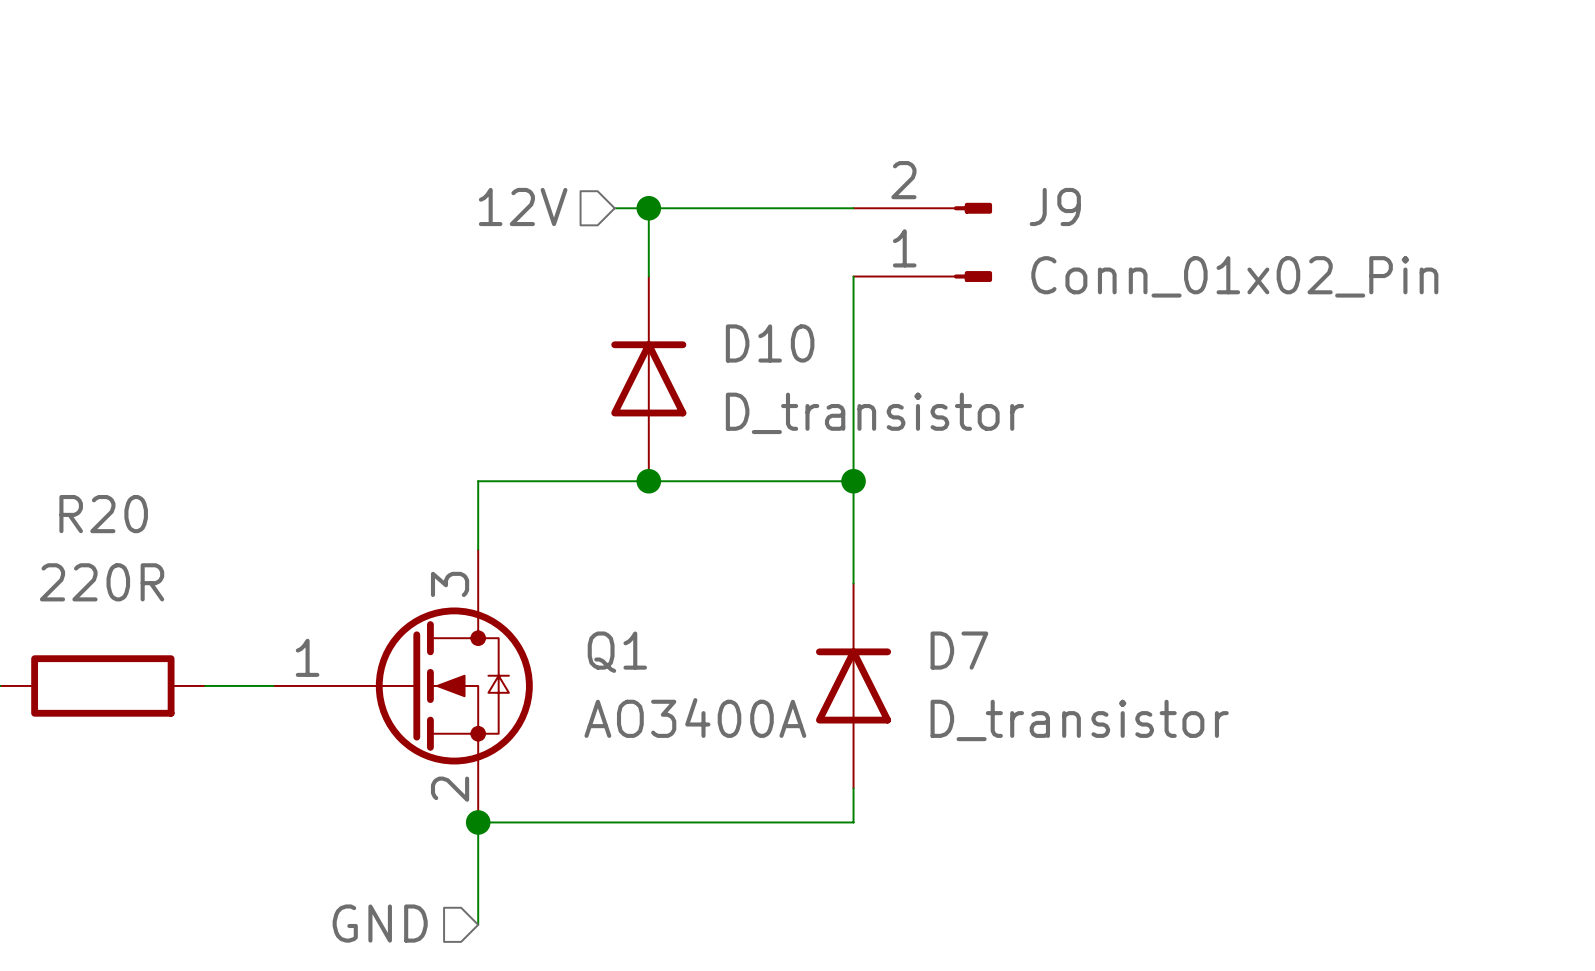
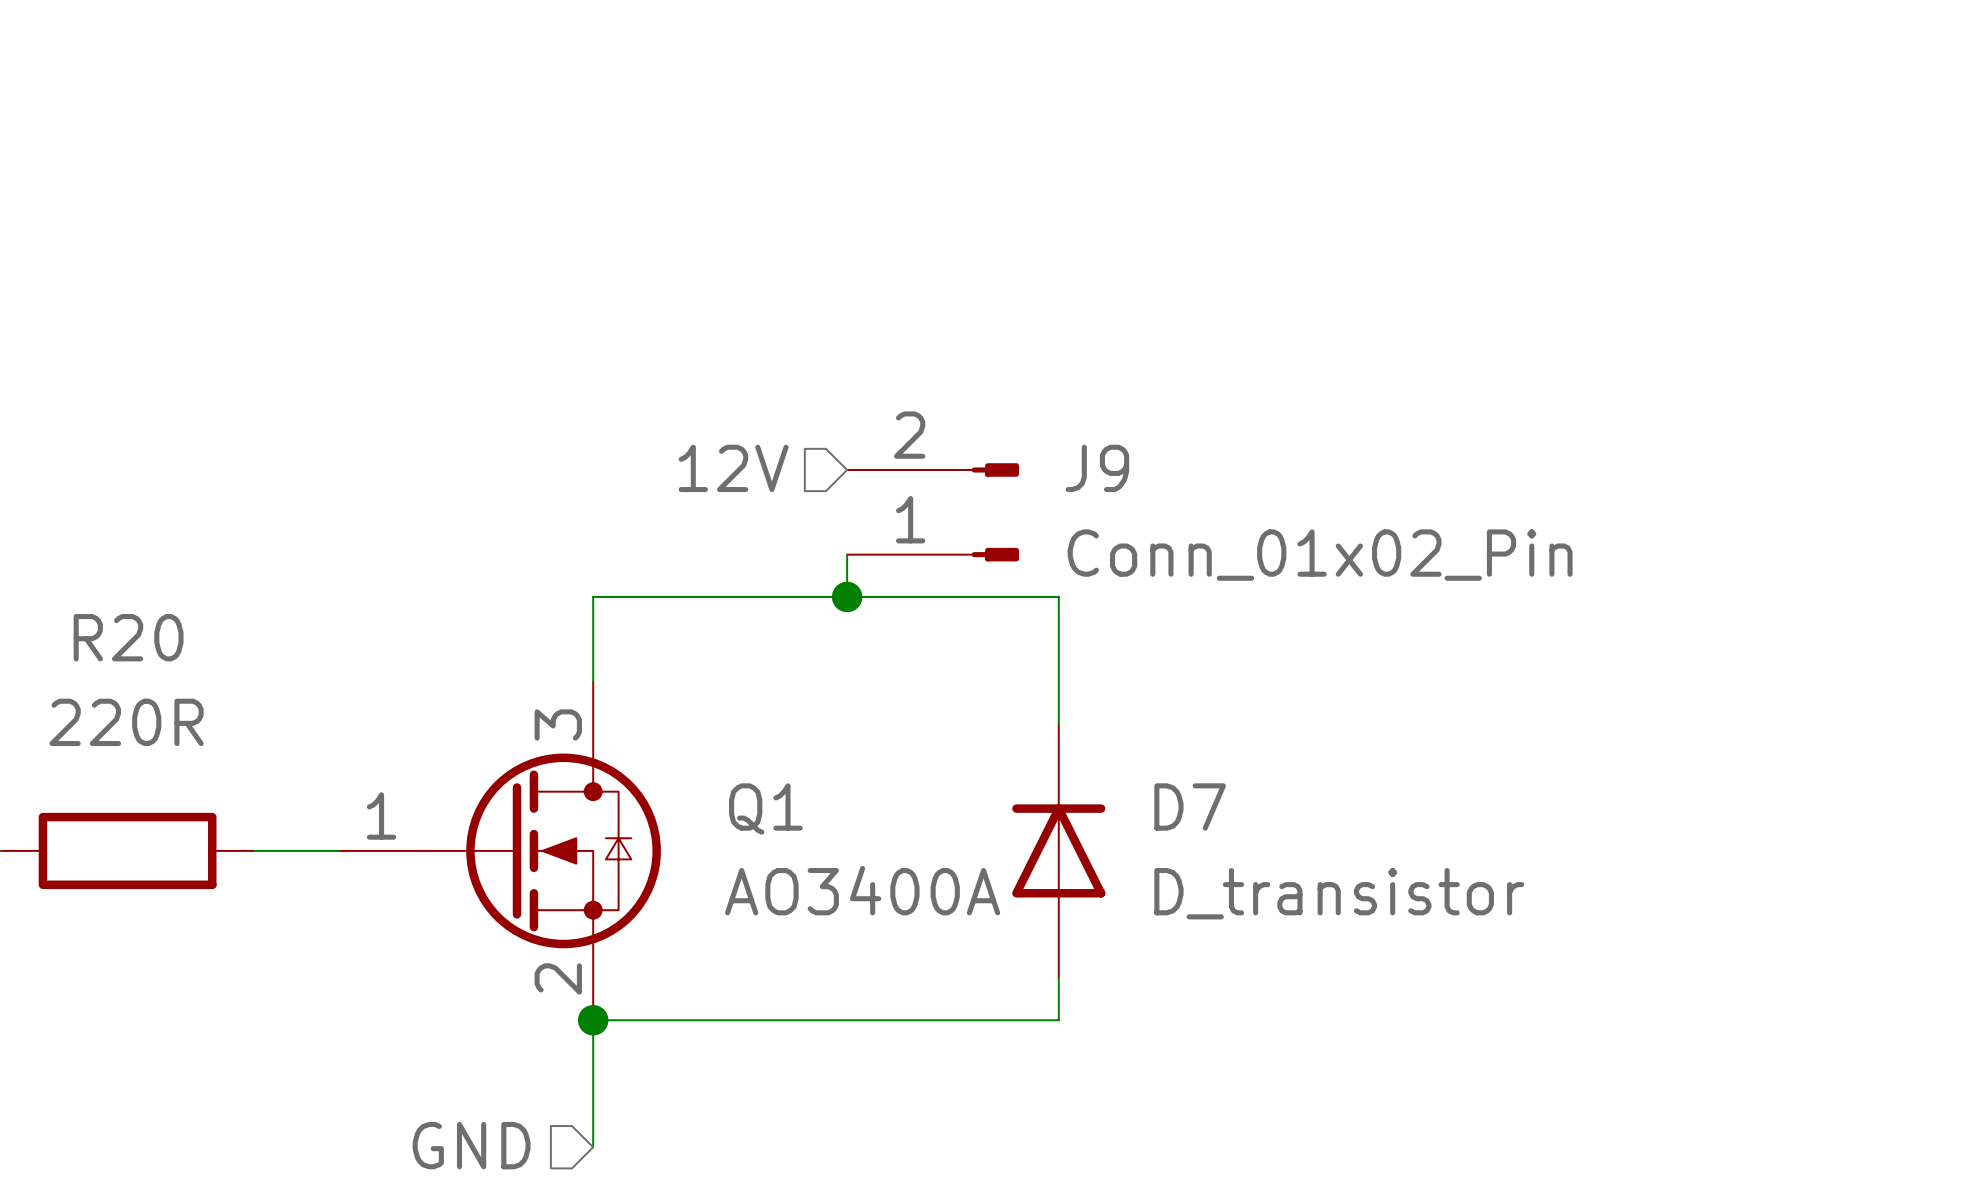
hierarchical label position: 12V (523, 206) -> 12V (733, 468)
wire: (614, 208) (853, 208) -> none
wire: (648, 208) (648, 276) -> none
junction: (648, 208) -> none
J9 position: (922, 242) -> (933, 512)
wire: (853, 276) (853, 481) -> none
D10: D_transistor (648, 378) -> none
wire: none -> (847, 554) (847, 596)
junction position: (648, 481) -> (847, 596)
junction: (853, 481) -> none

